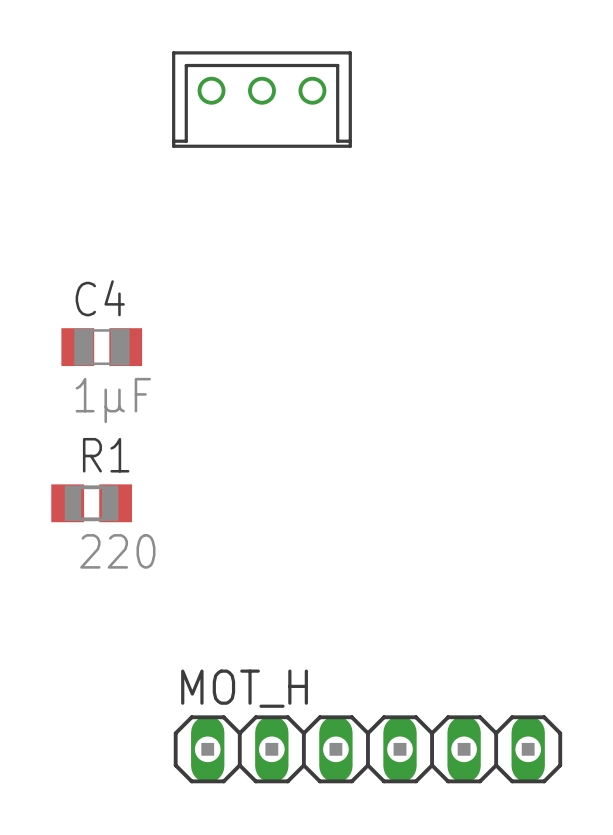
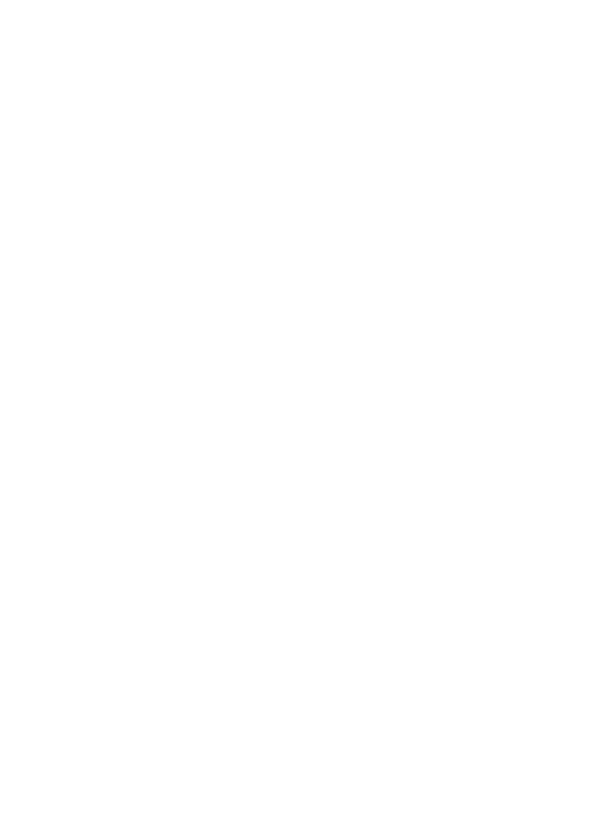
part: (261, 99) -> none
C4: 1µF (101, 347) -> none
R1: 220 (91, 503) -> none
MOT_H: (367, 749) -> none

